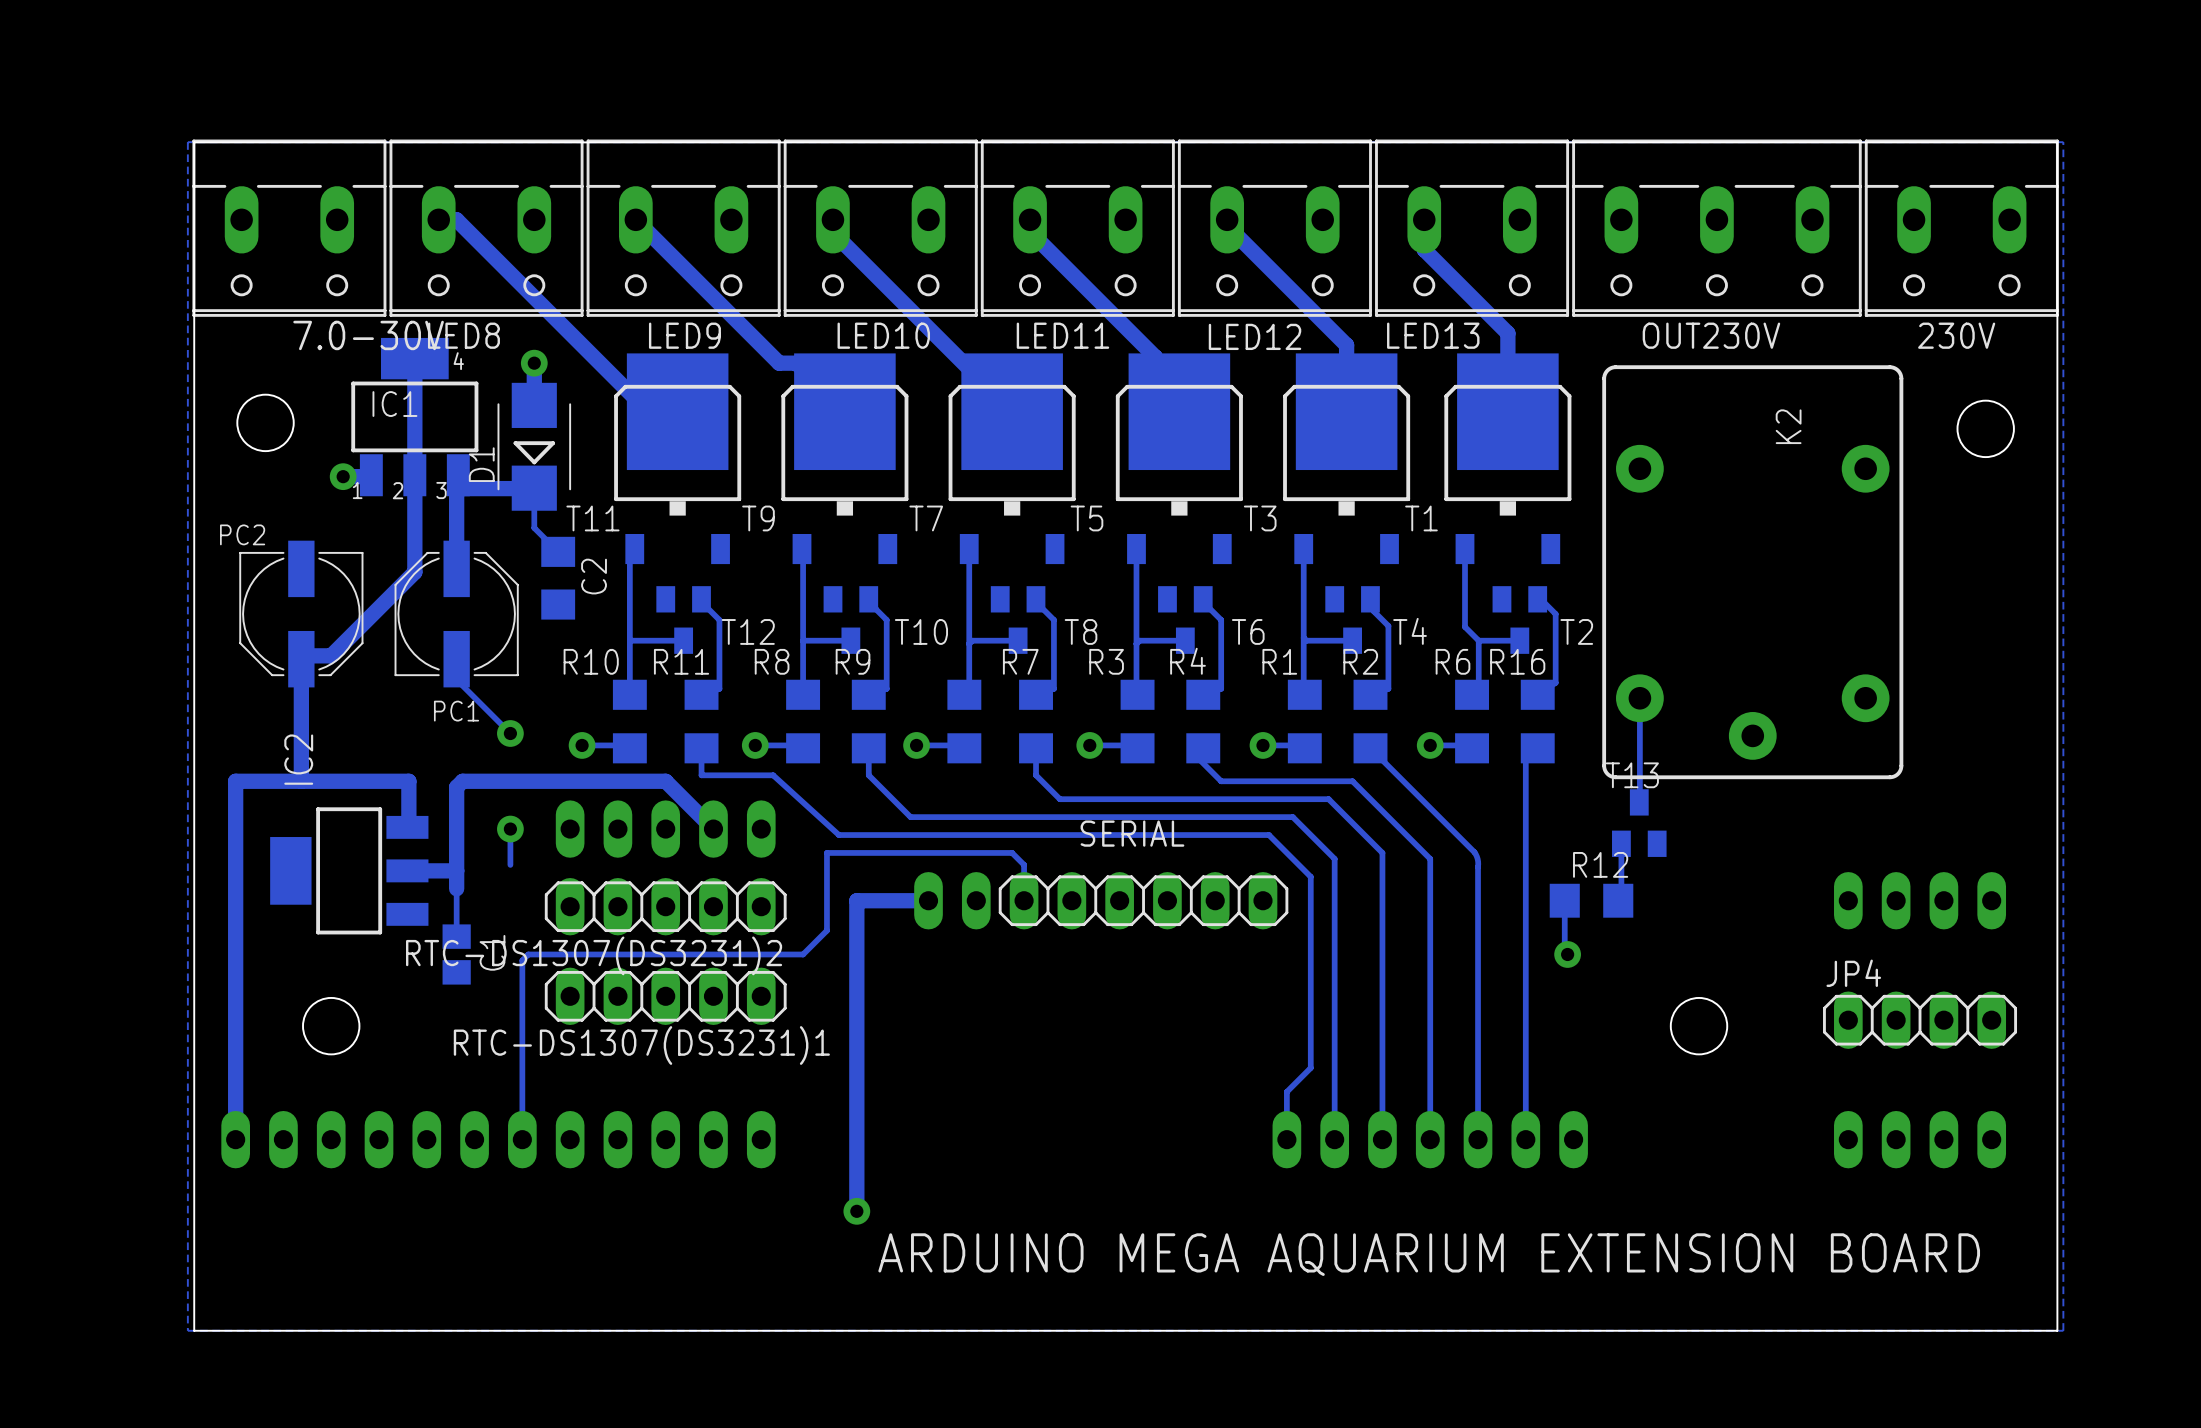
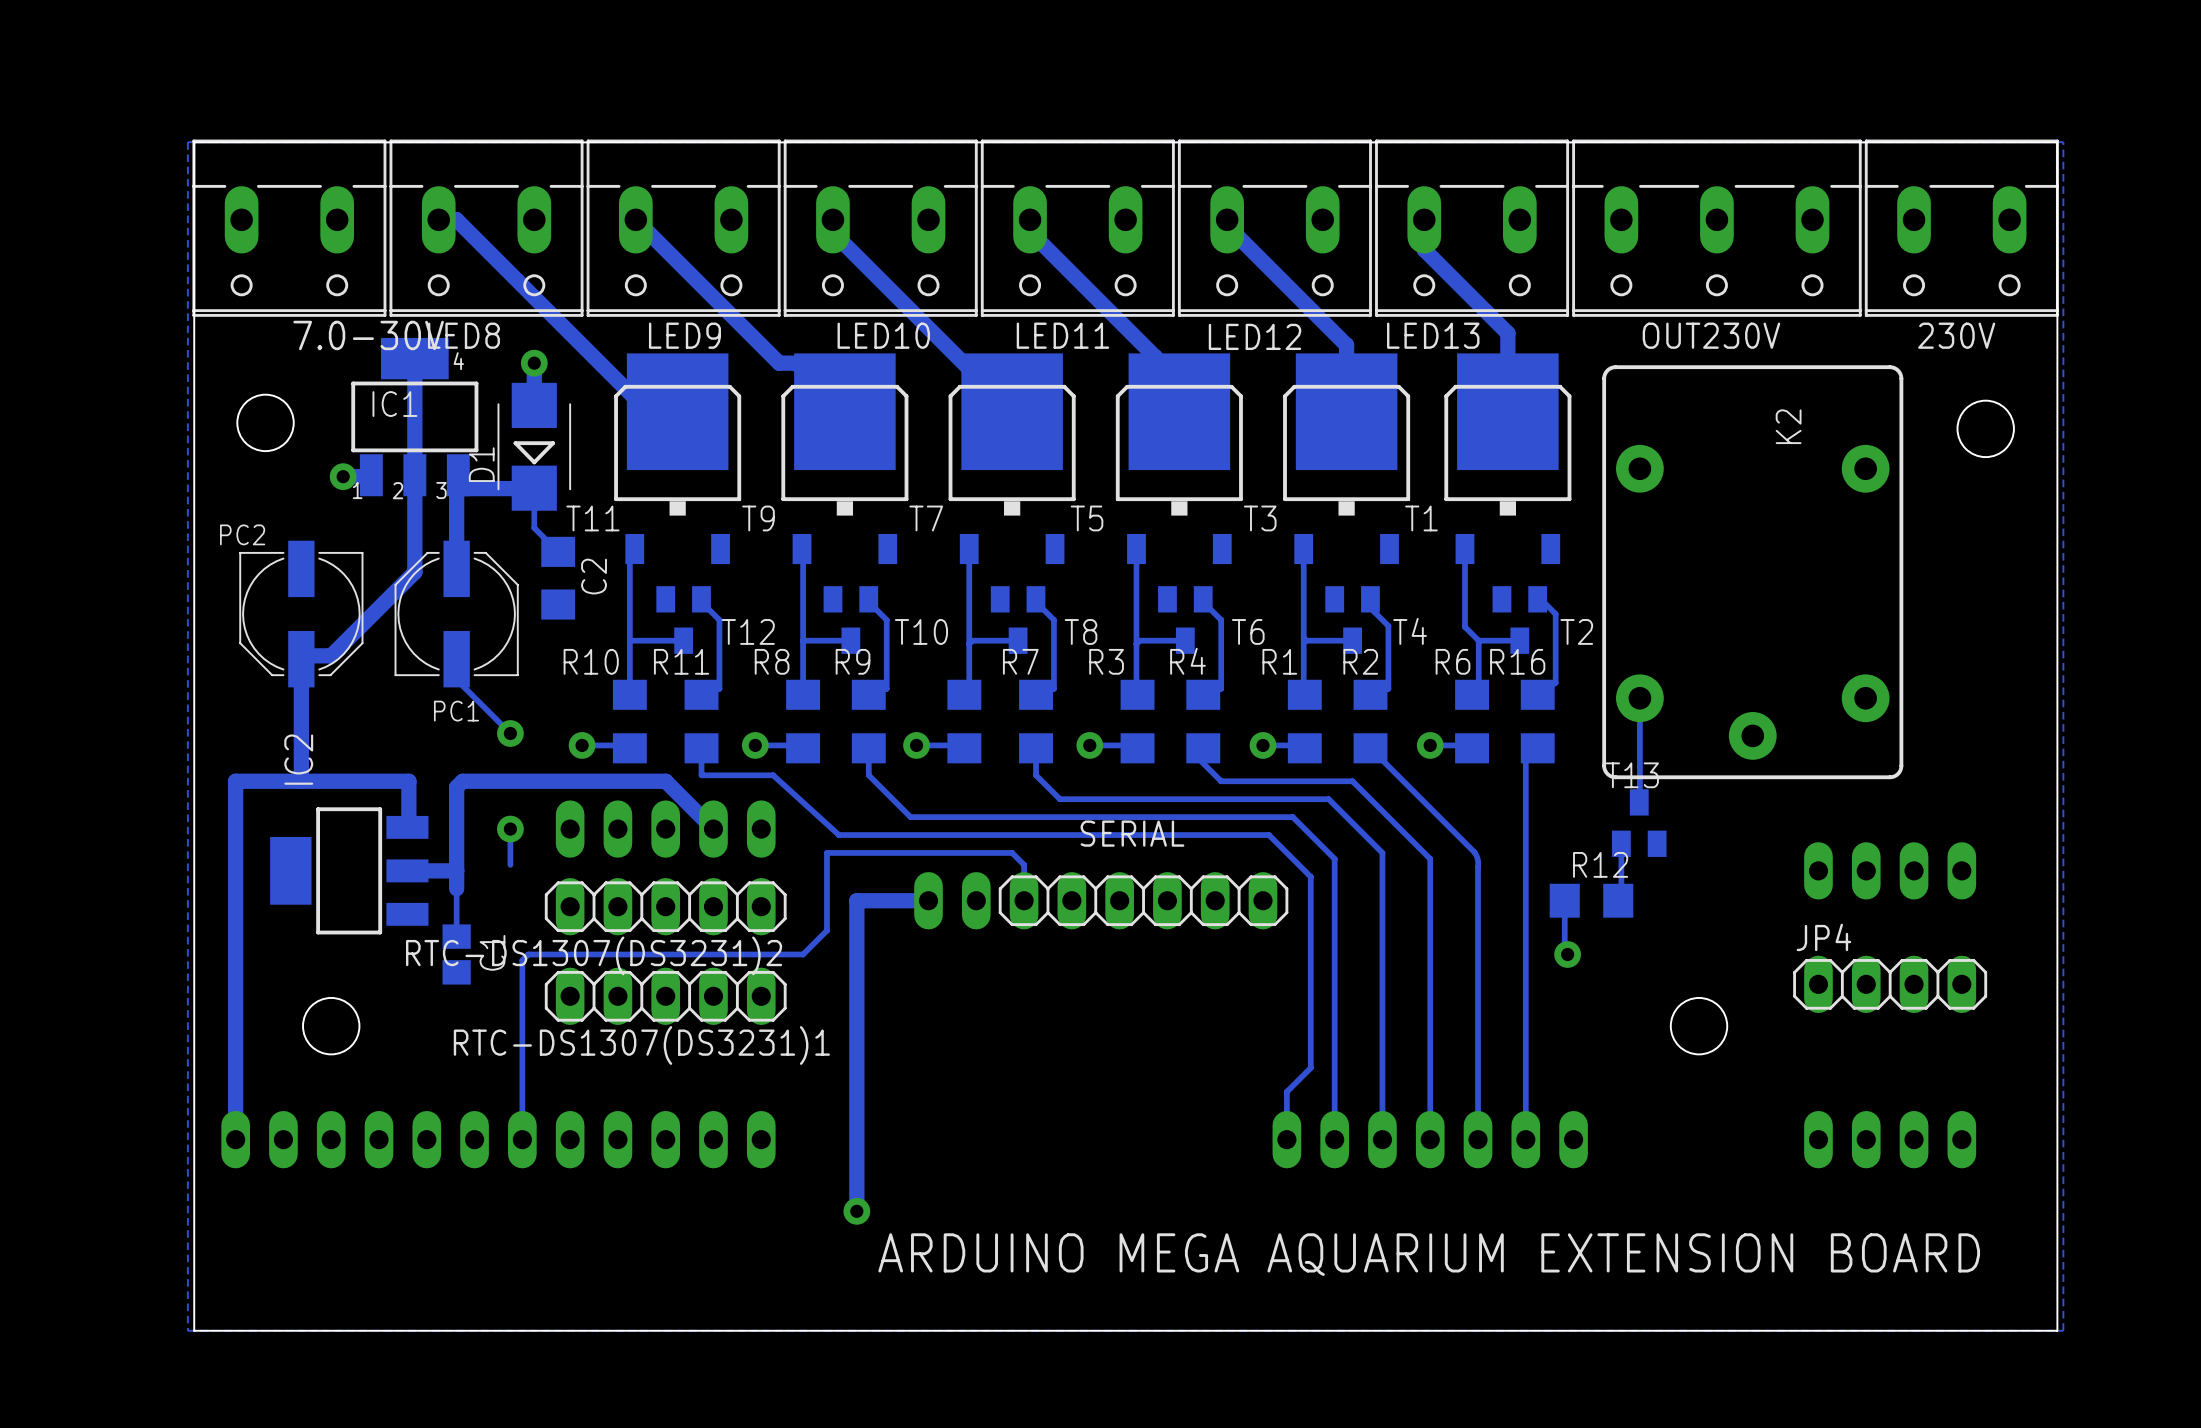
part position: (1920, 900) -> (1890, 870)
JP4 position: (1920, 1020) -> (1890, 984)
part position: (1920, 1139) -> (1890, 1139)

